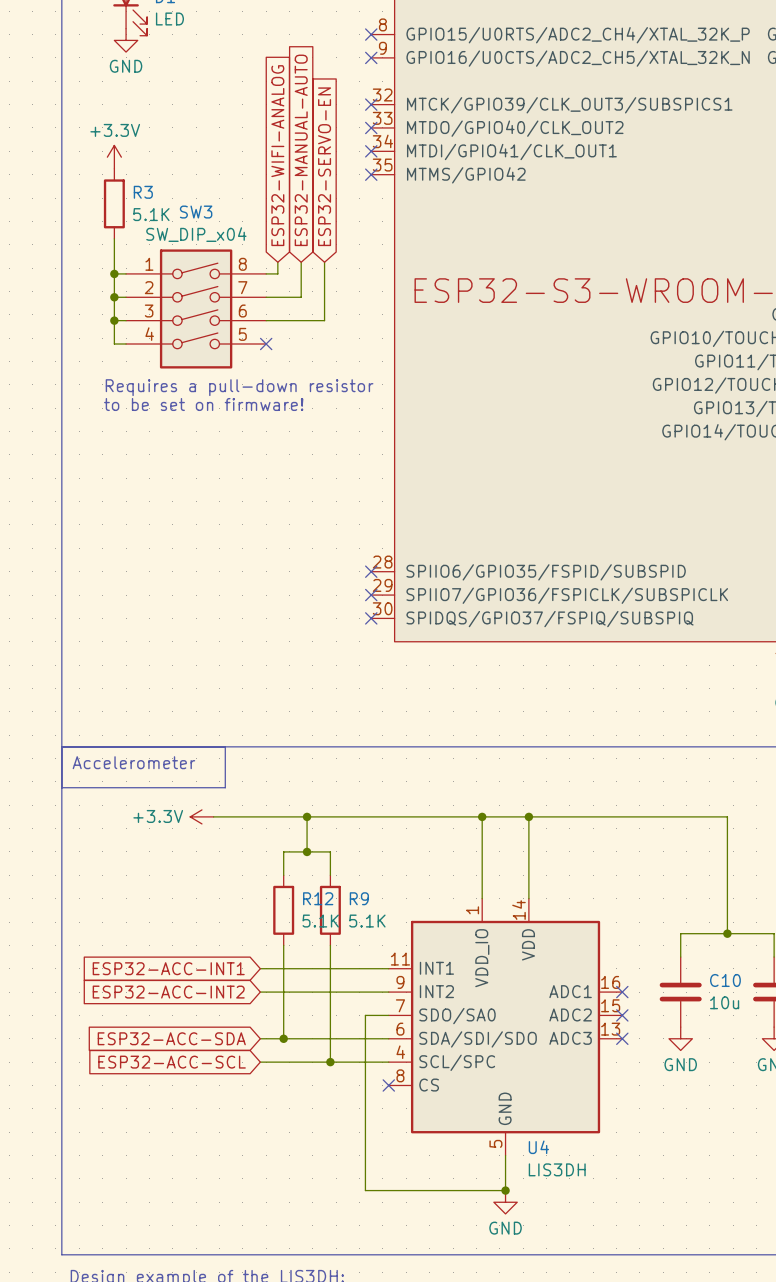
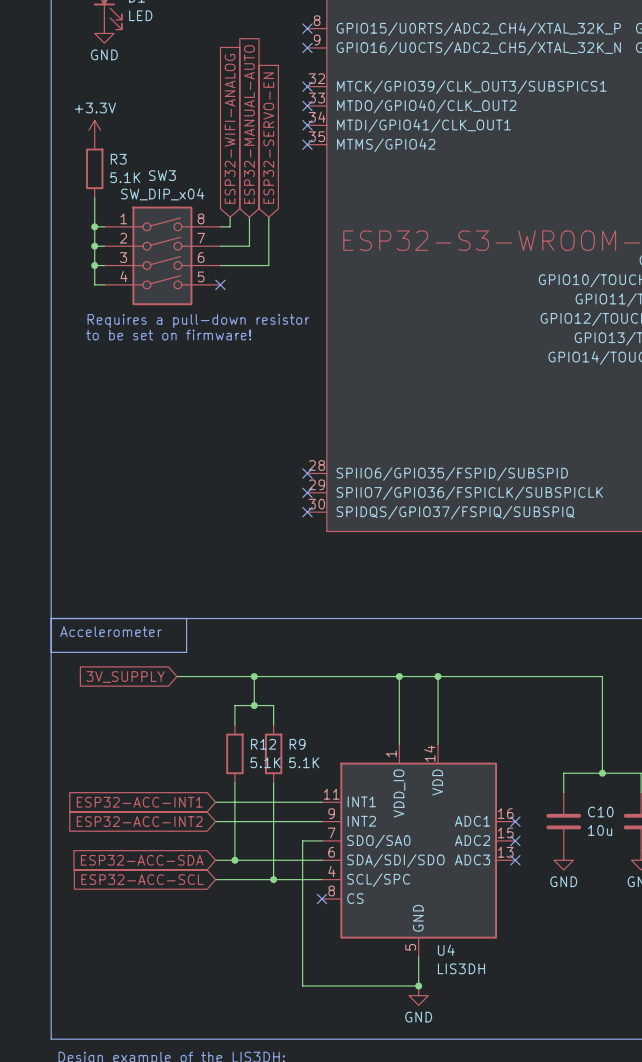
power symbol: +3.3V (201, 816) -> none
global label: none -> 3V_SUPPLY (125, 677)

